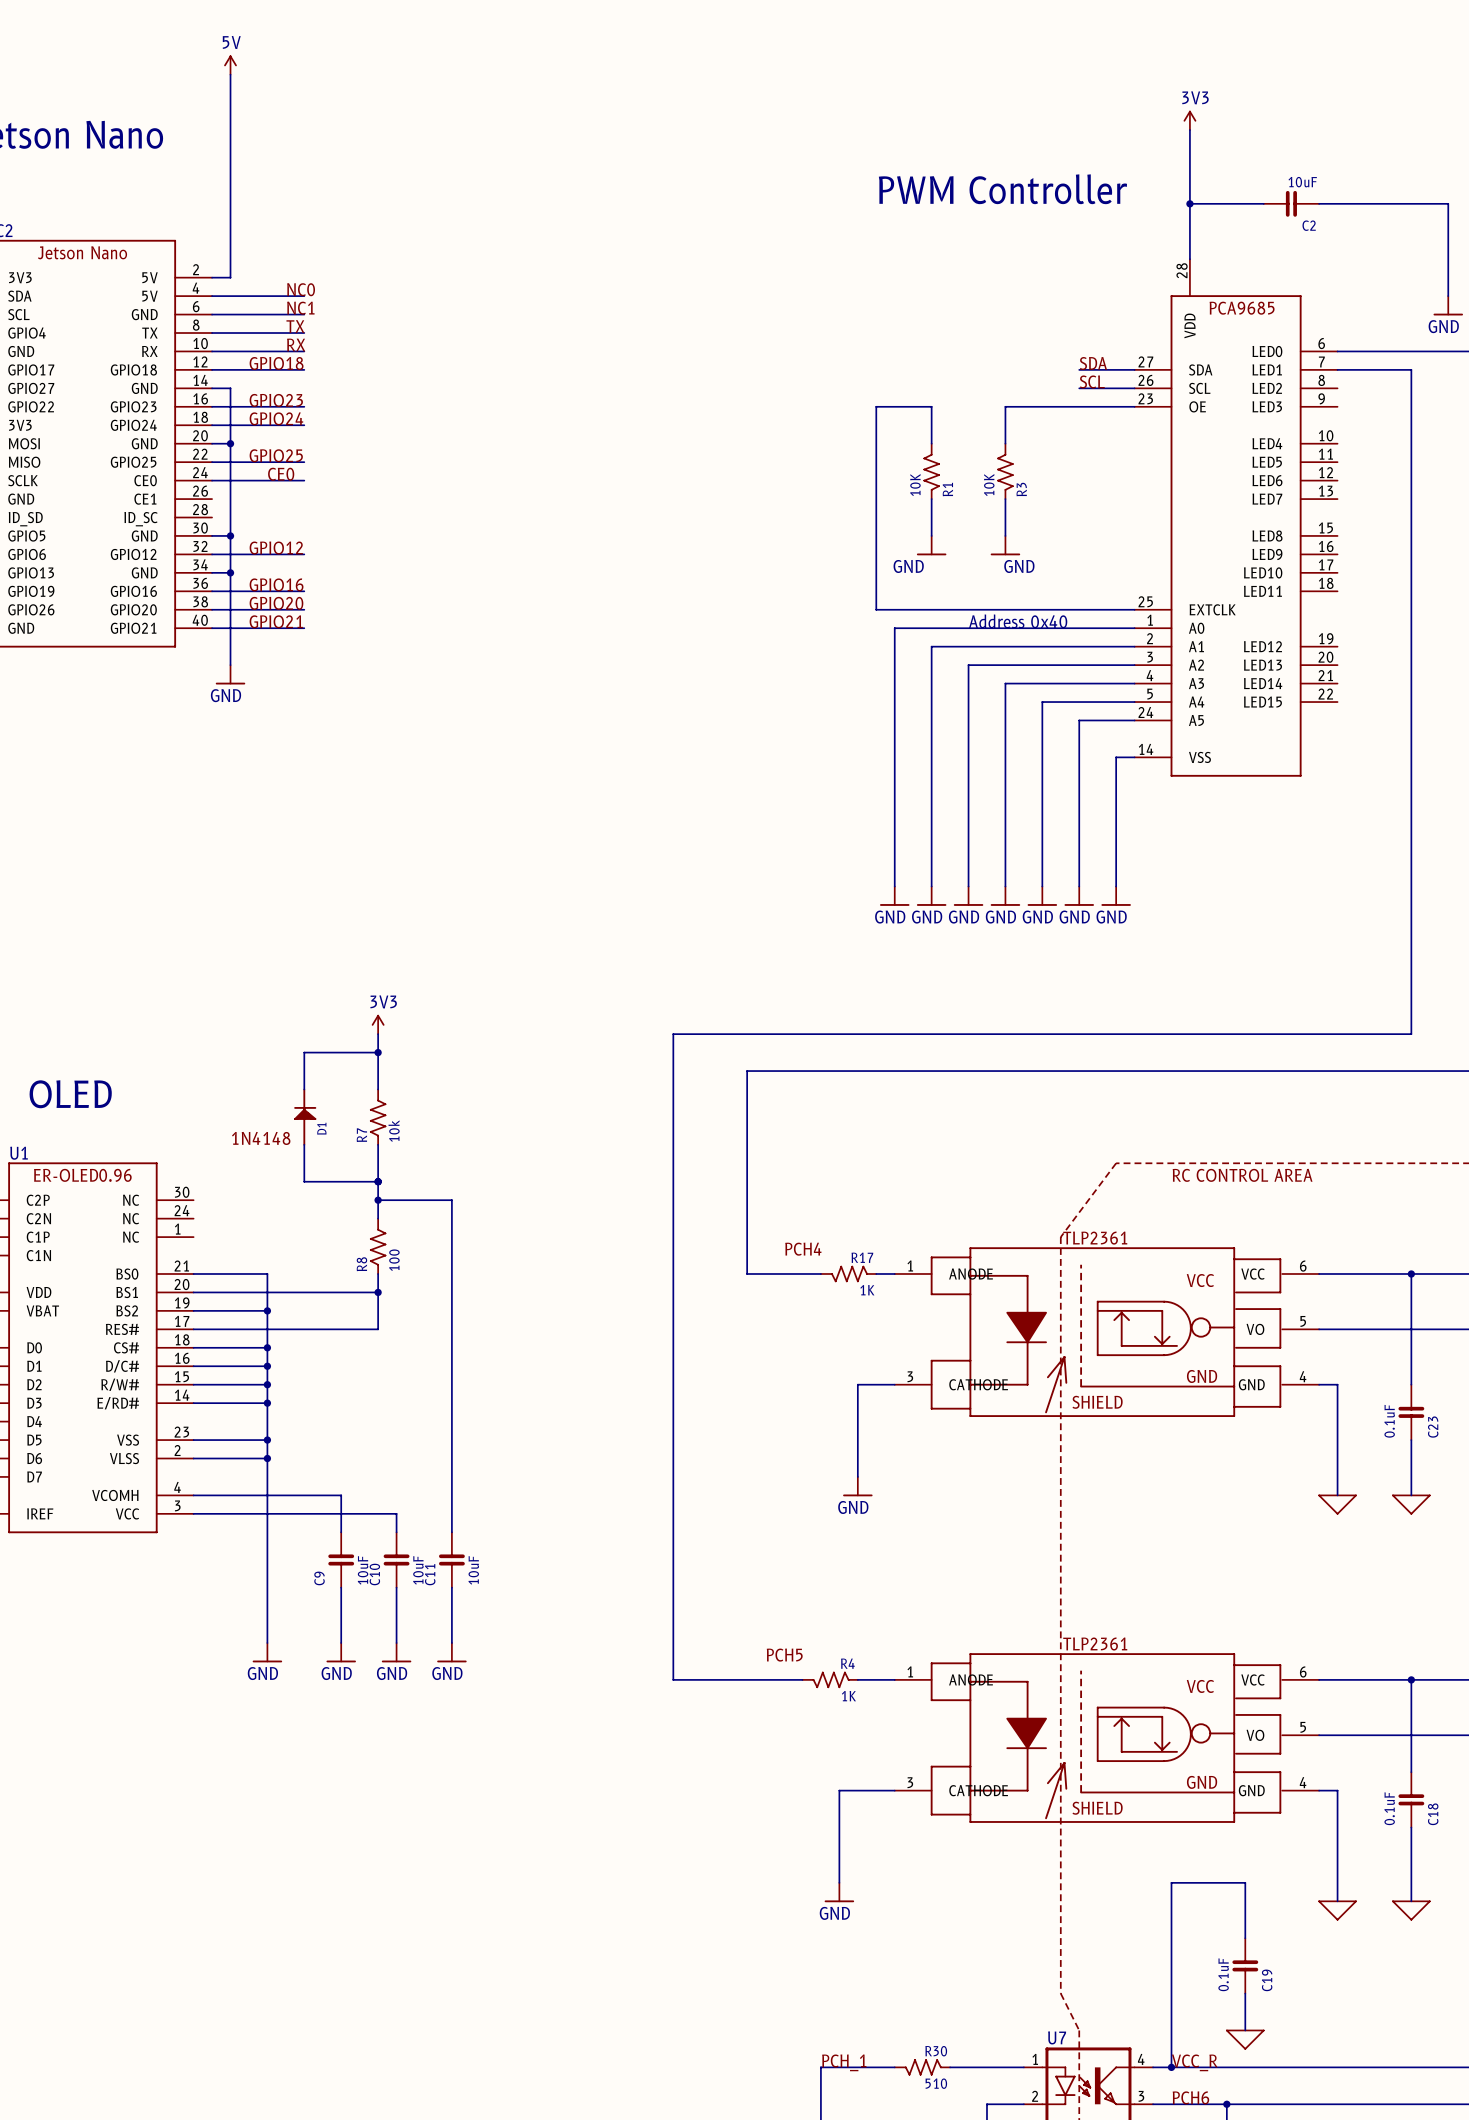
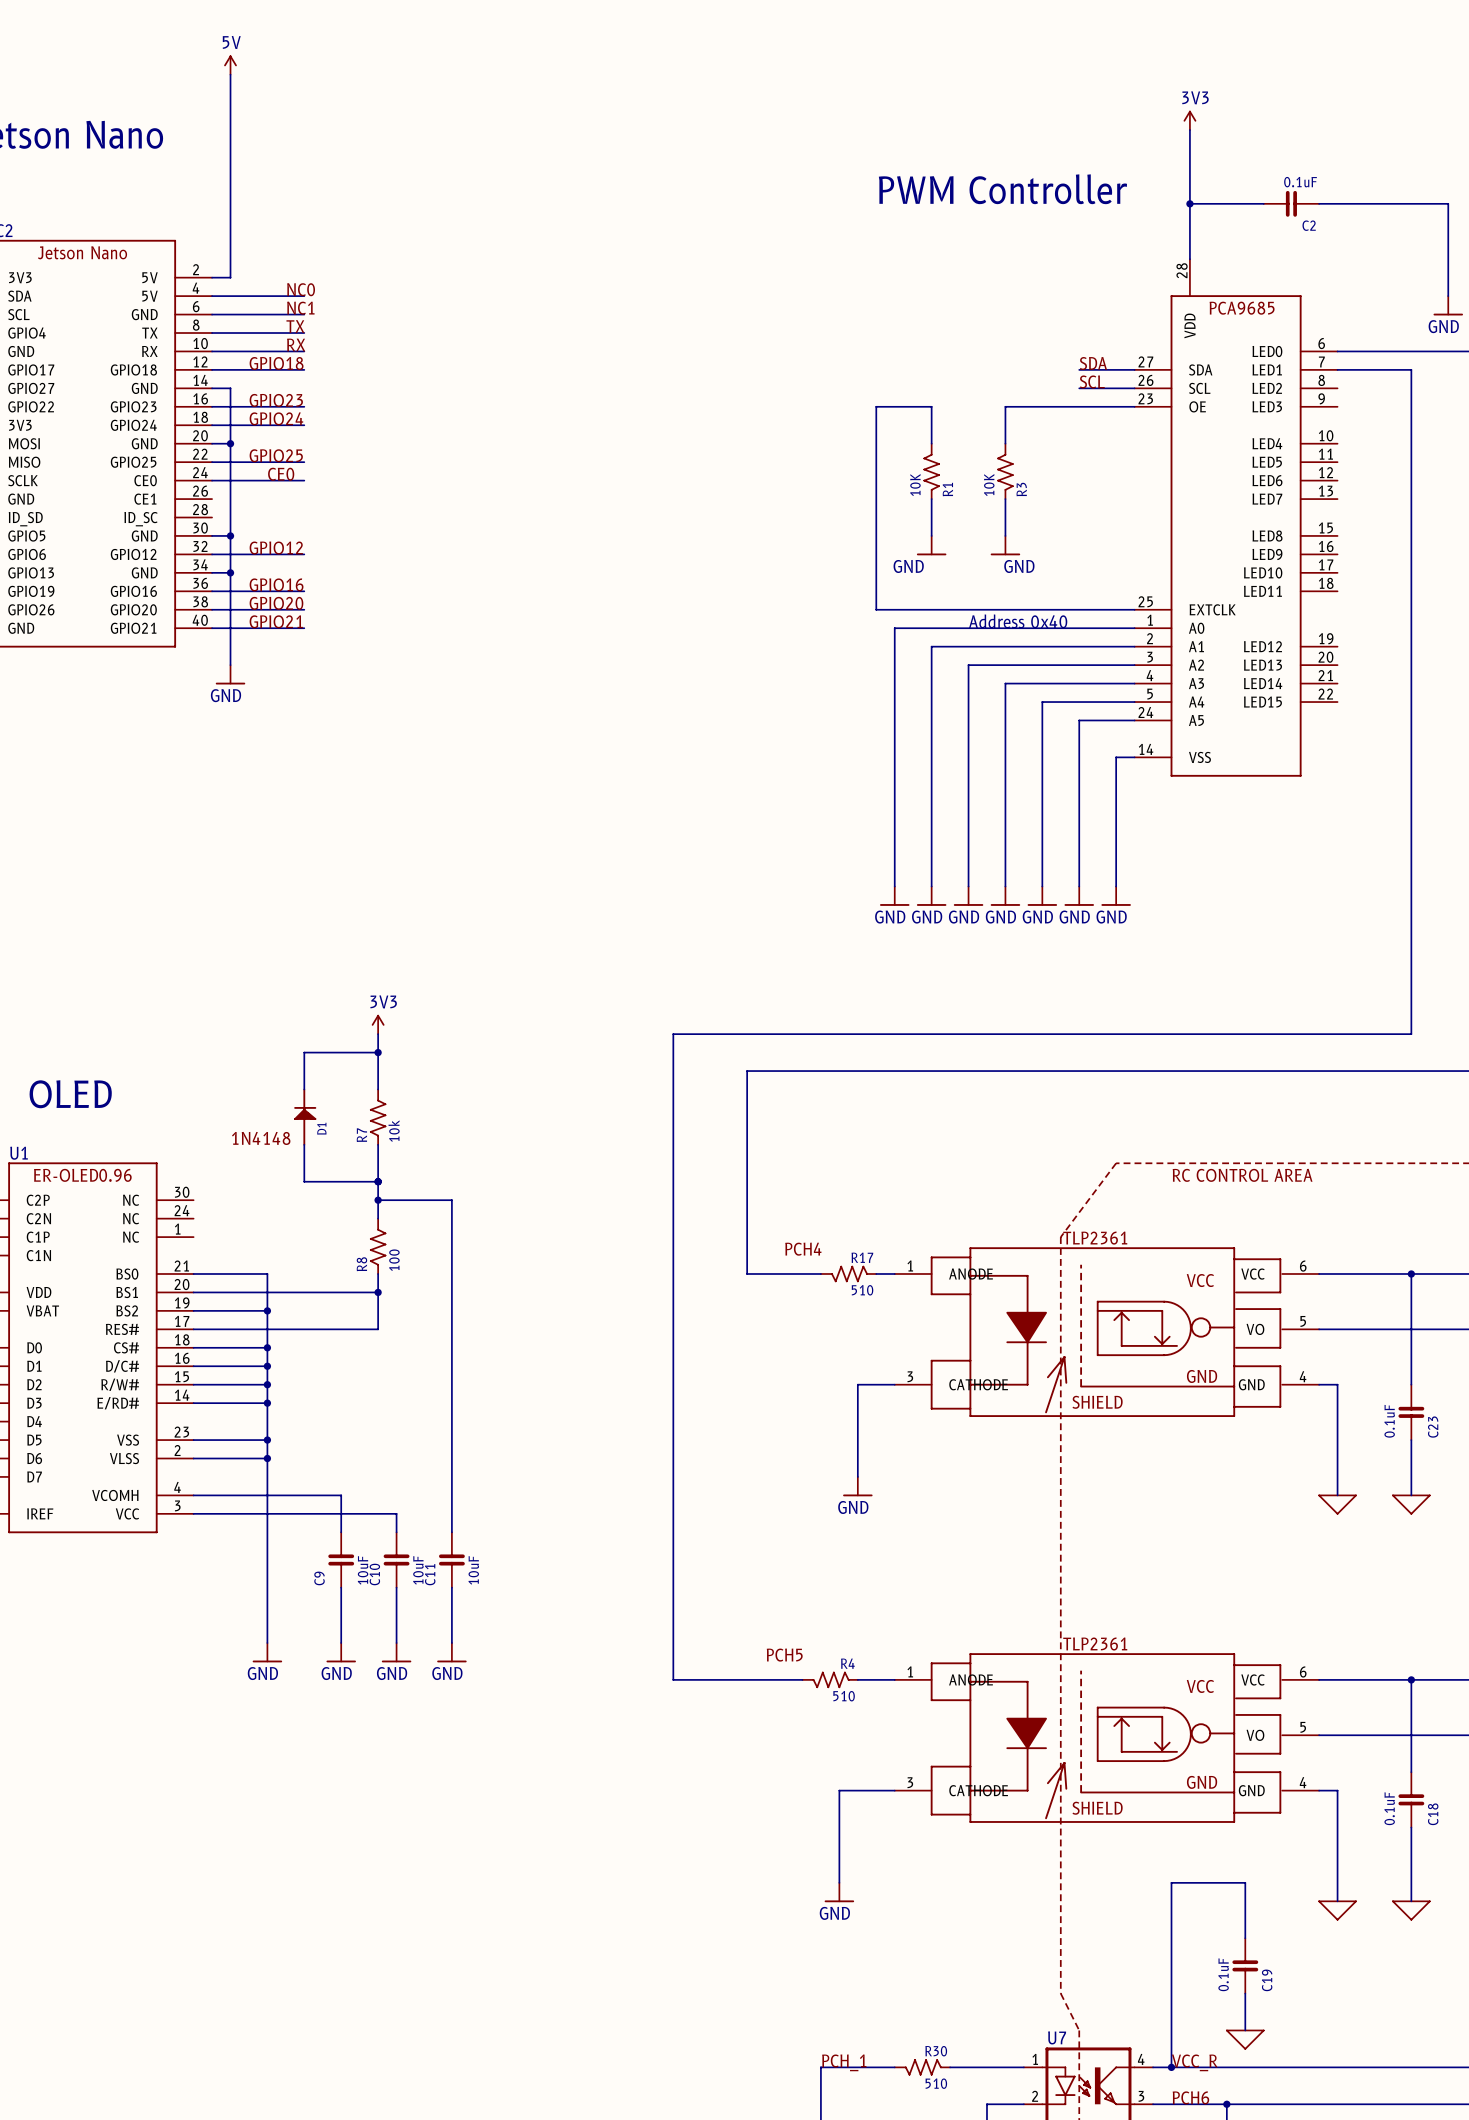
C2 value: 10uF (1302, 182) -> 0.1uF (1300, 182)
R17 value: 1K (867, 1290) -> 510 (862, 1290)
R4 value: 1K (848, 1696) -> 510 (844, 1696)

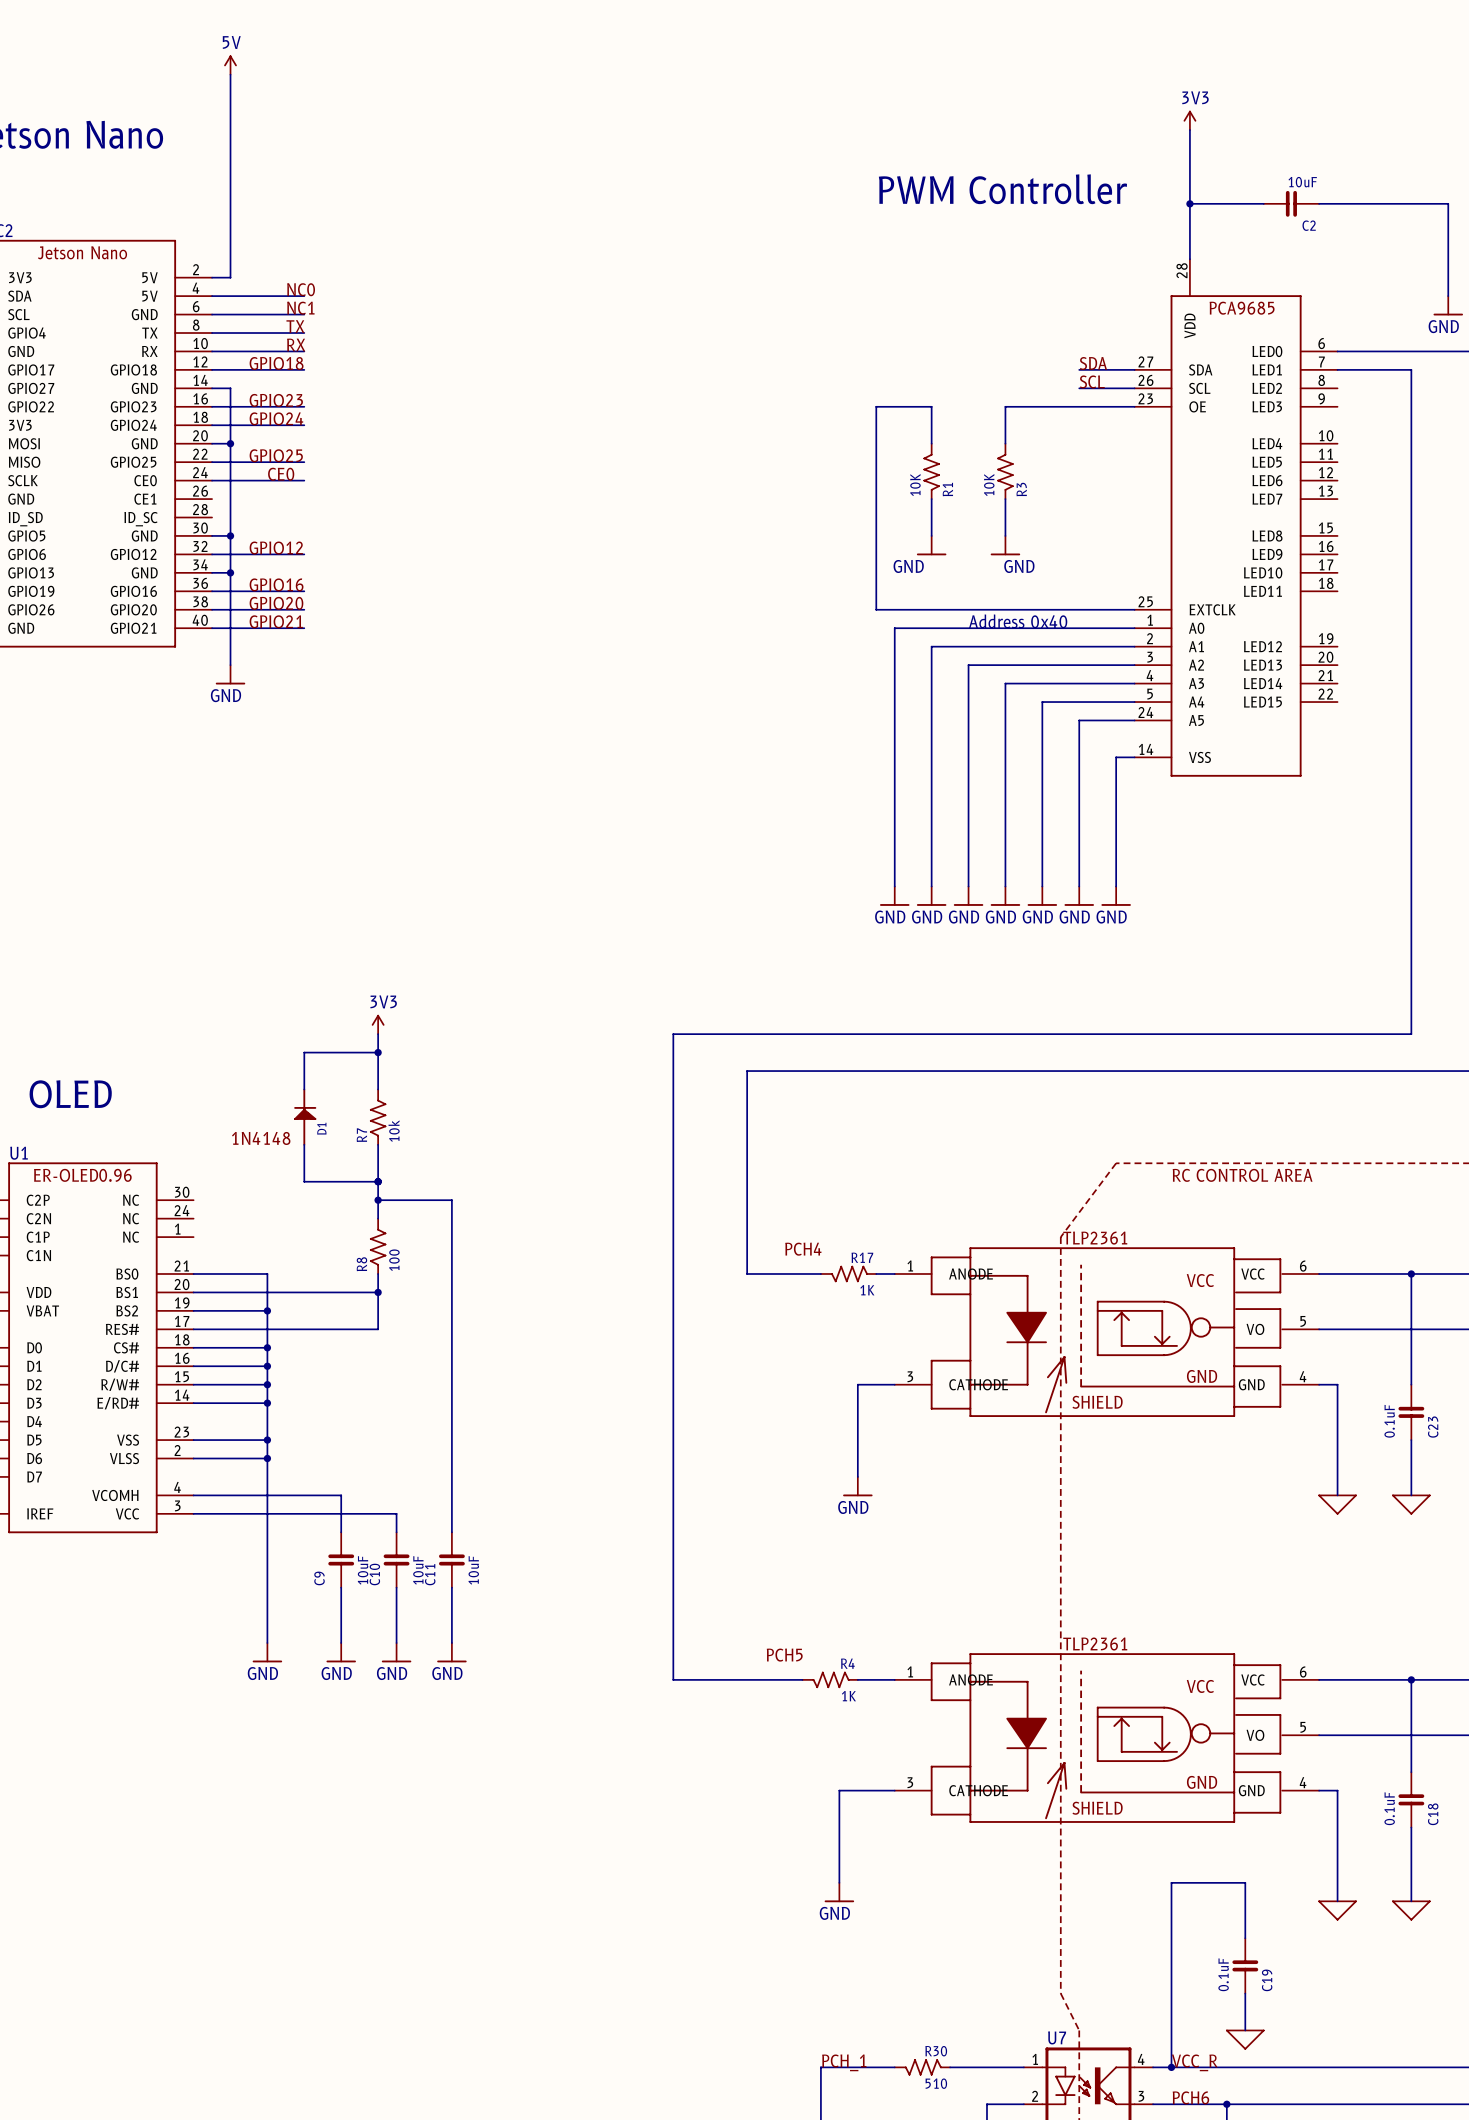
C2 value: 0.1uF (1300, 182) -> 10uF (1302, 182)
R17 value: 510 (862, 1290) -> 1K (867, 1290)
R4 value: 510 (844, 1696) -> 1K (848, 1696)

